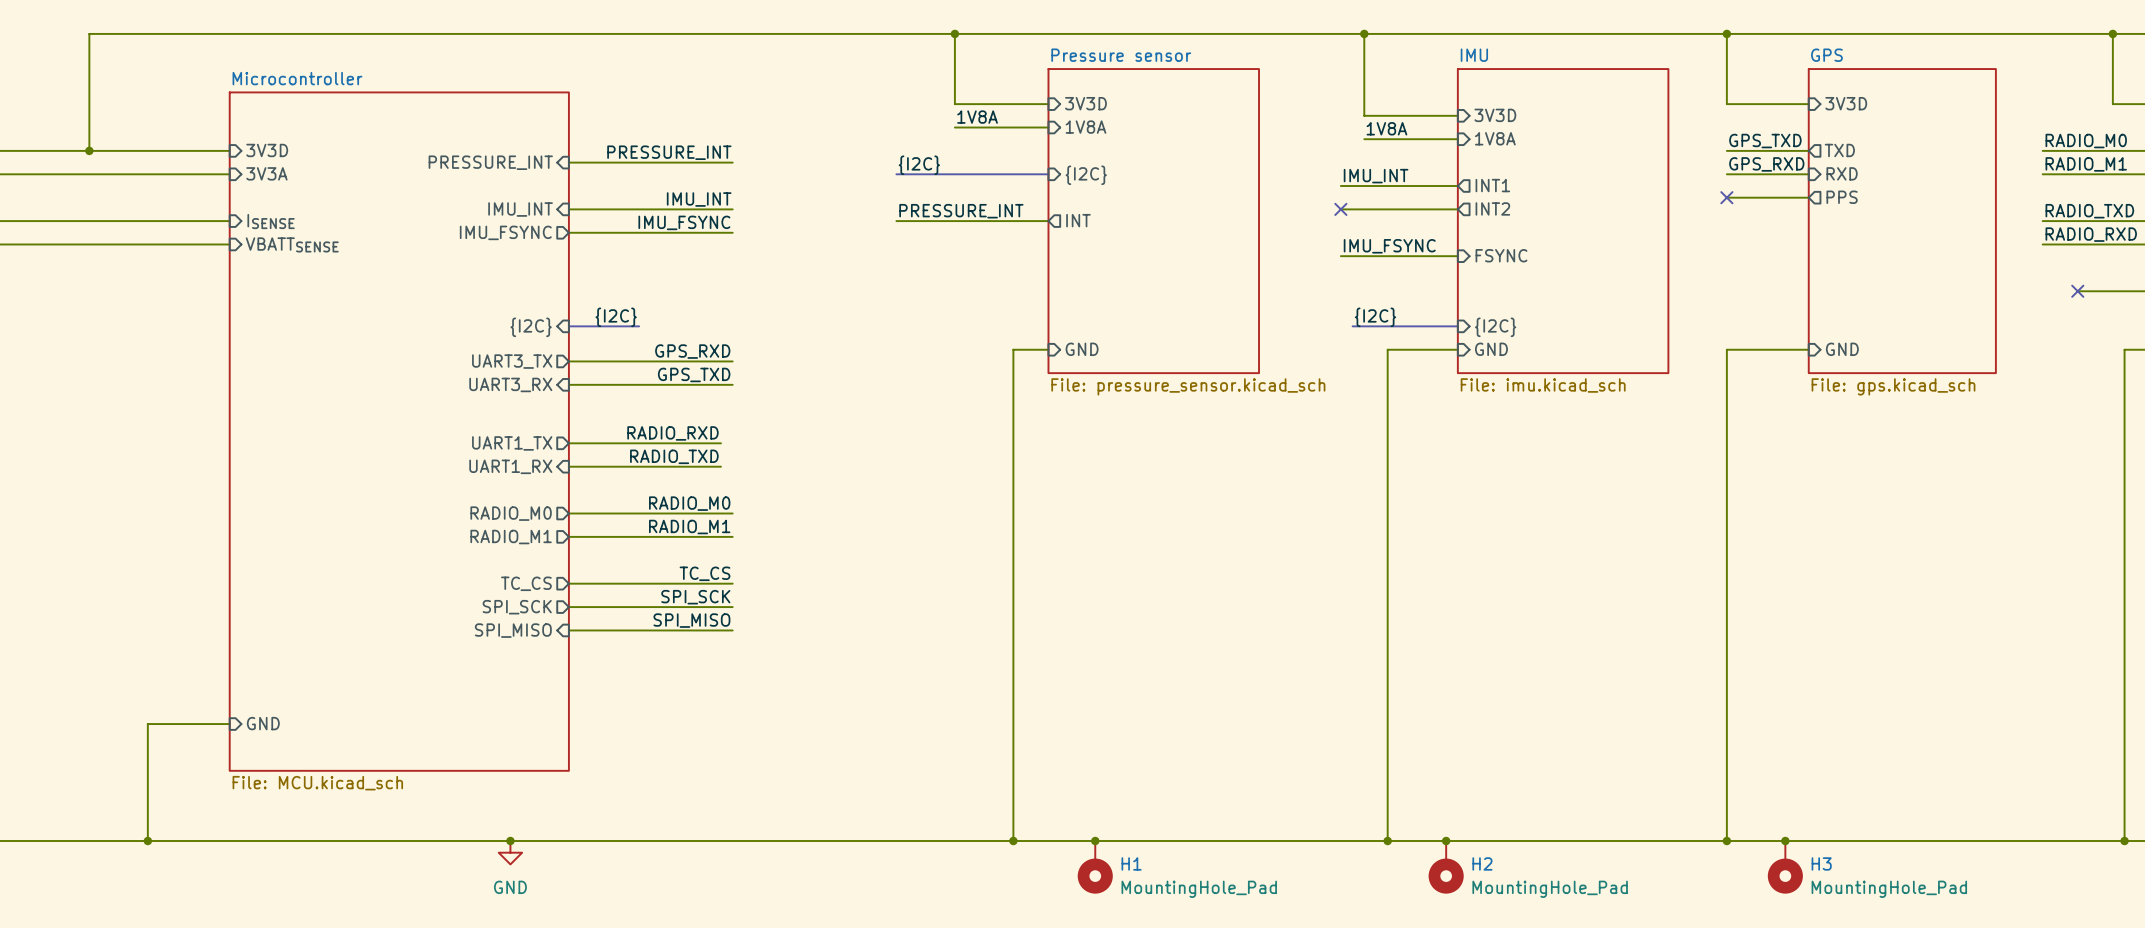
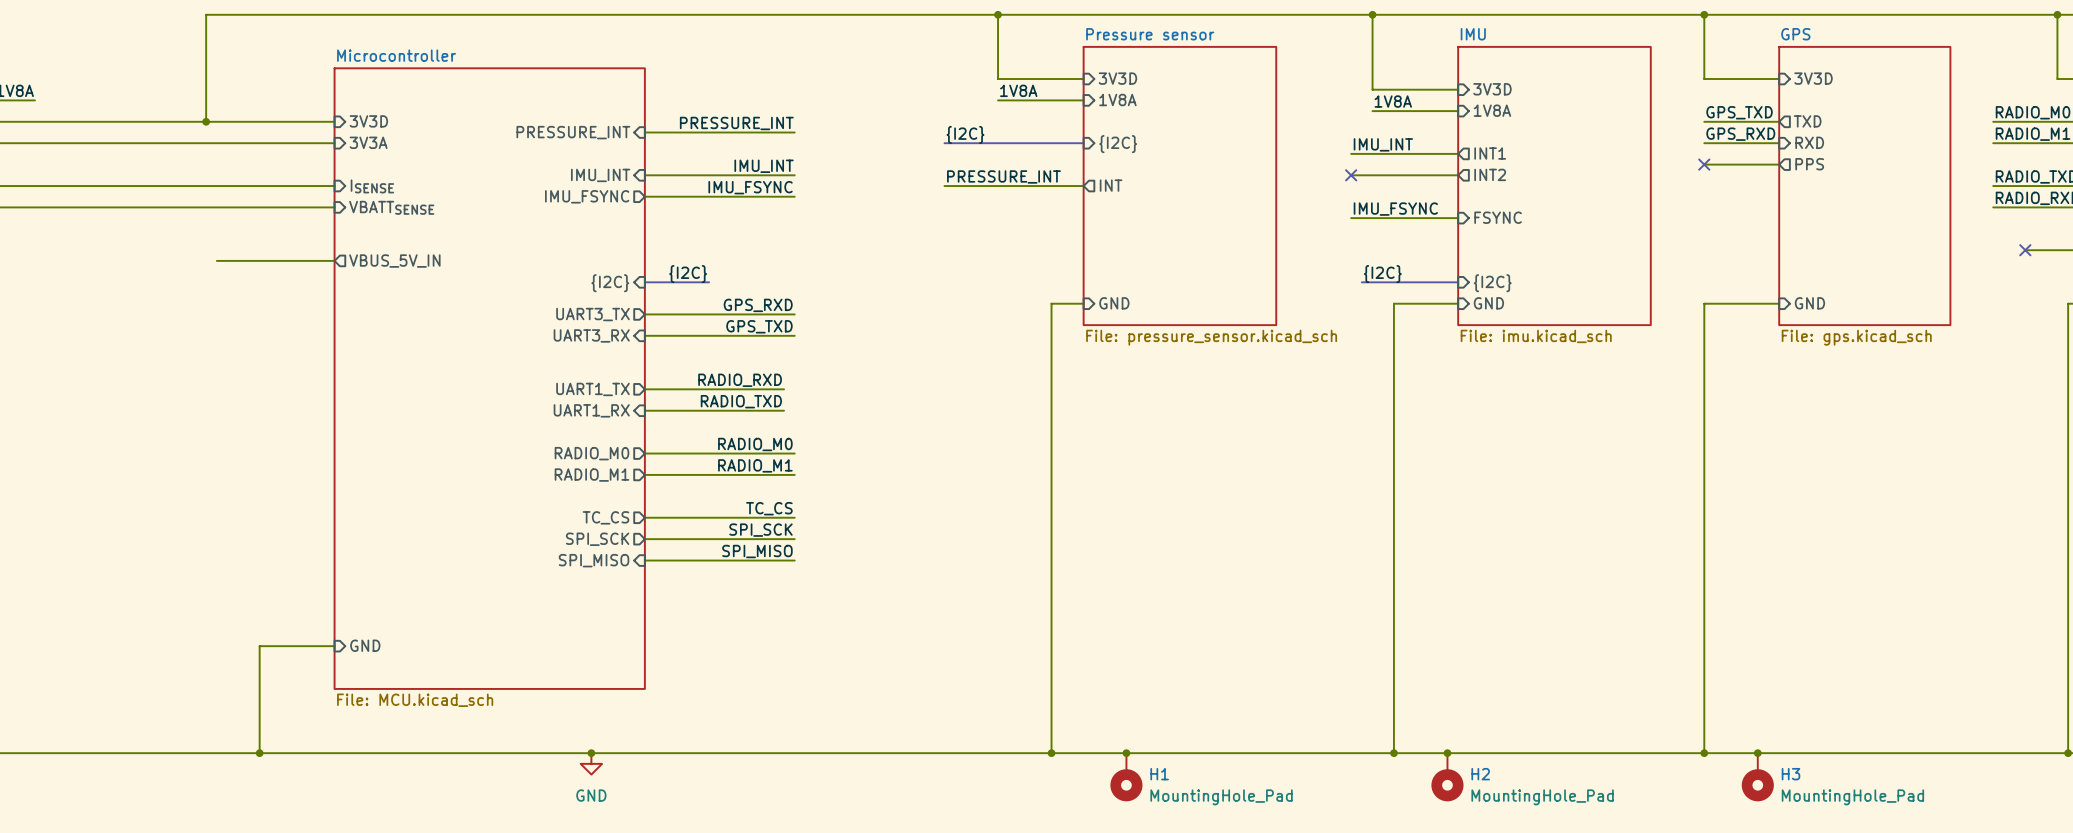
wire: none -> (216, 260) (334, 260)
sheet pin: none -> VBUS_5V_IN (394, 261)

